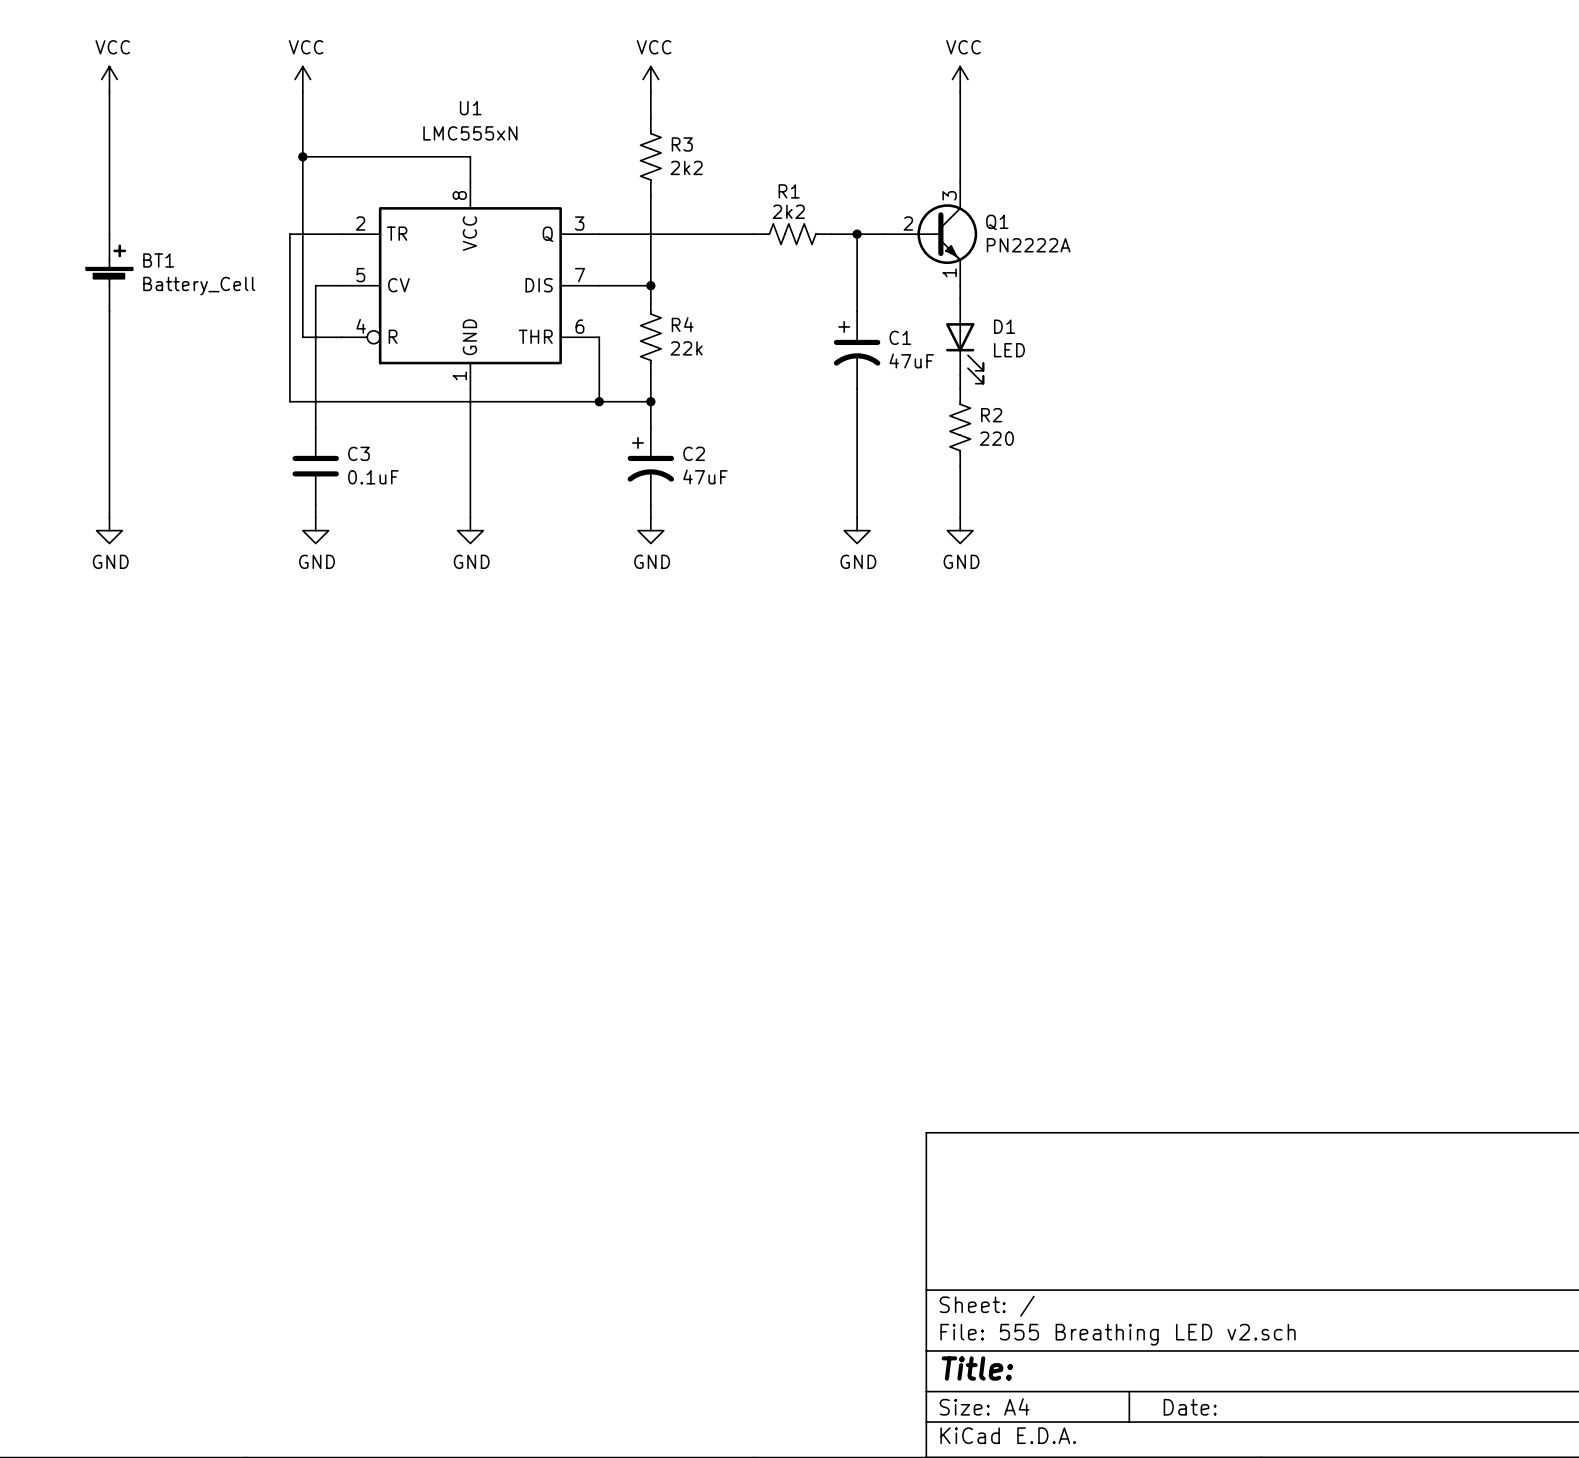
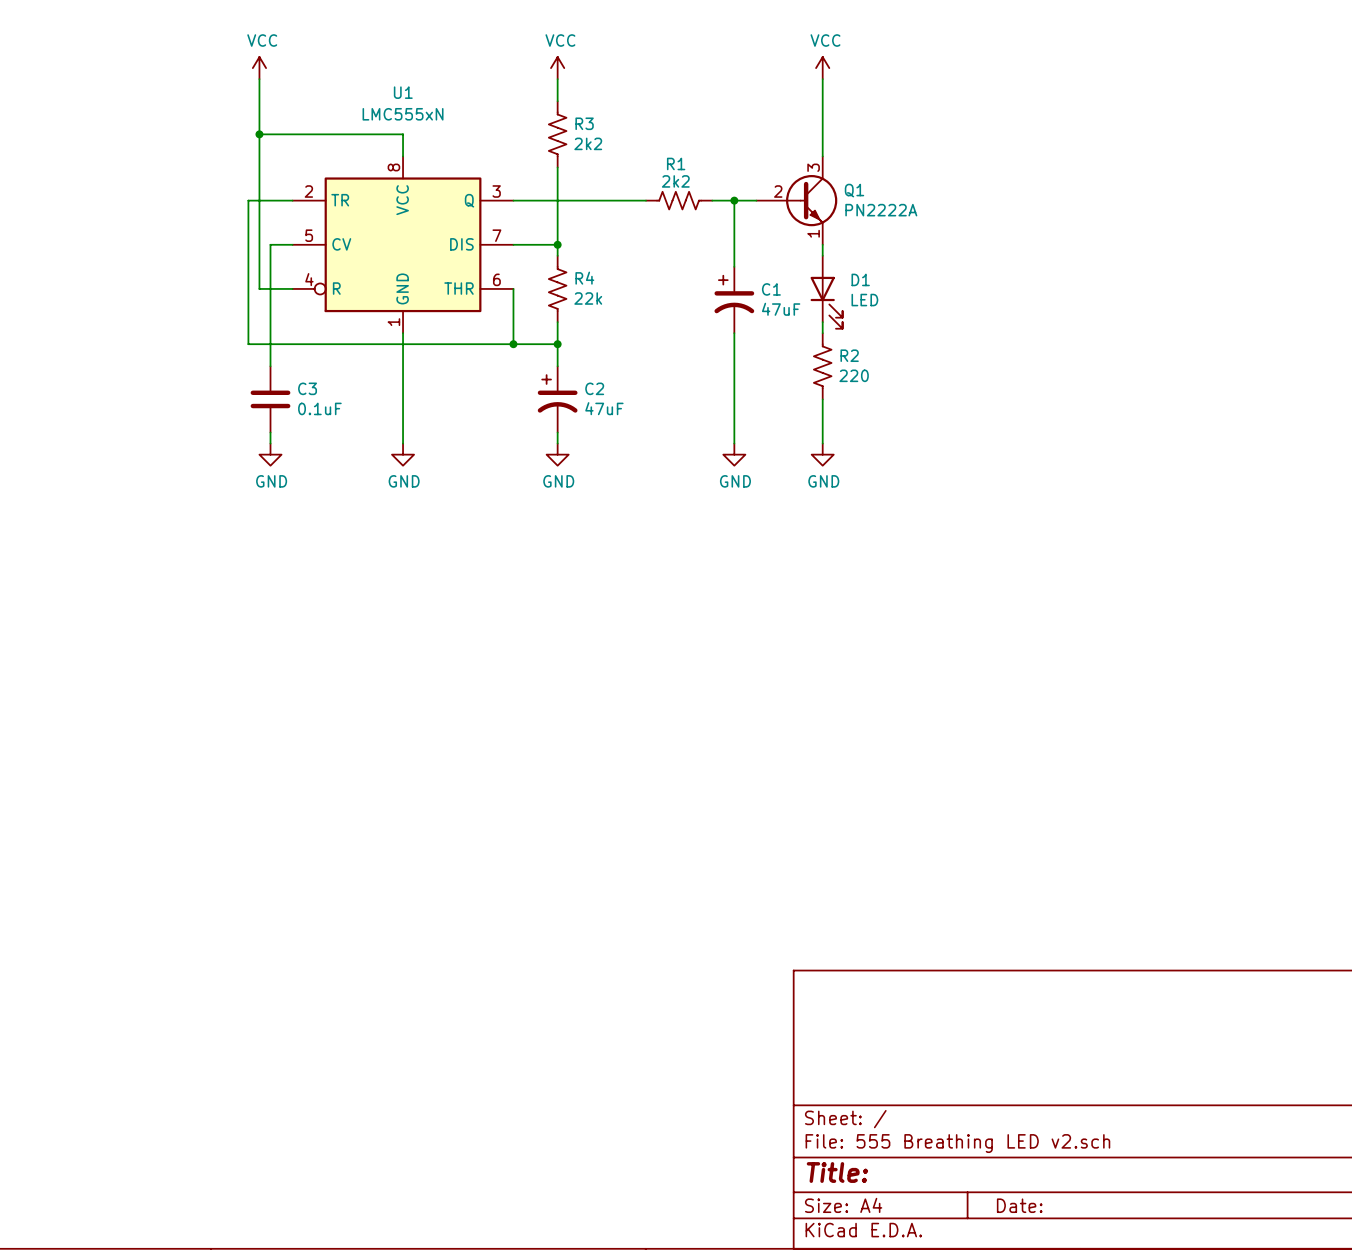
power symbol: VCC (109, 79) -> none
wire: (109, 92) (109, 234) -> none
BT1: Battery_Cell (109, 272) -> none
wire: (109, 311) (109, 517) -> none
power symbol: GND (109, 530) -> none

